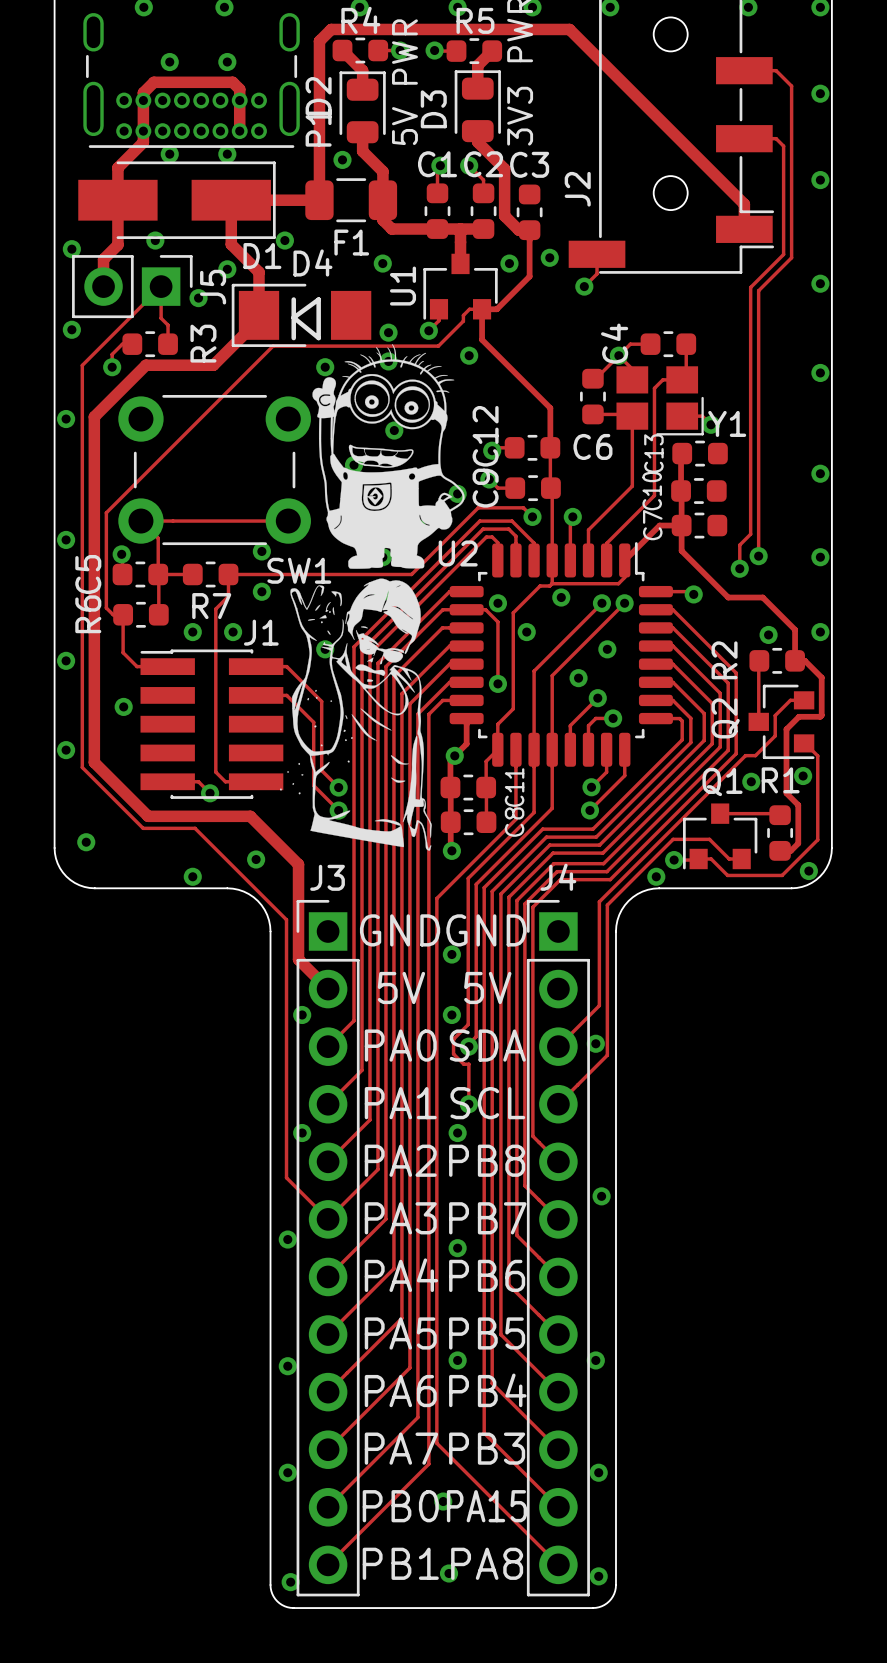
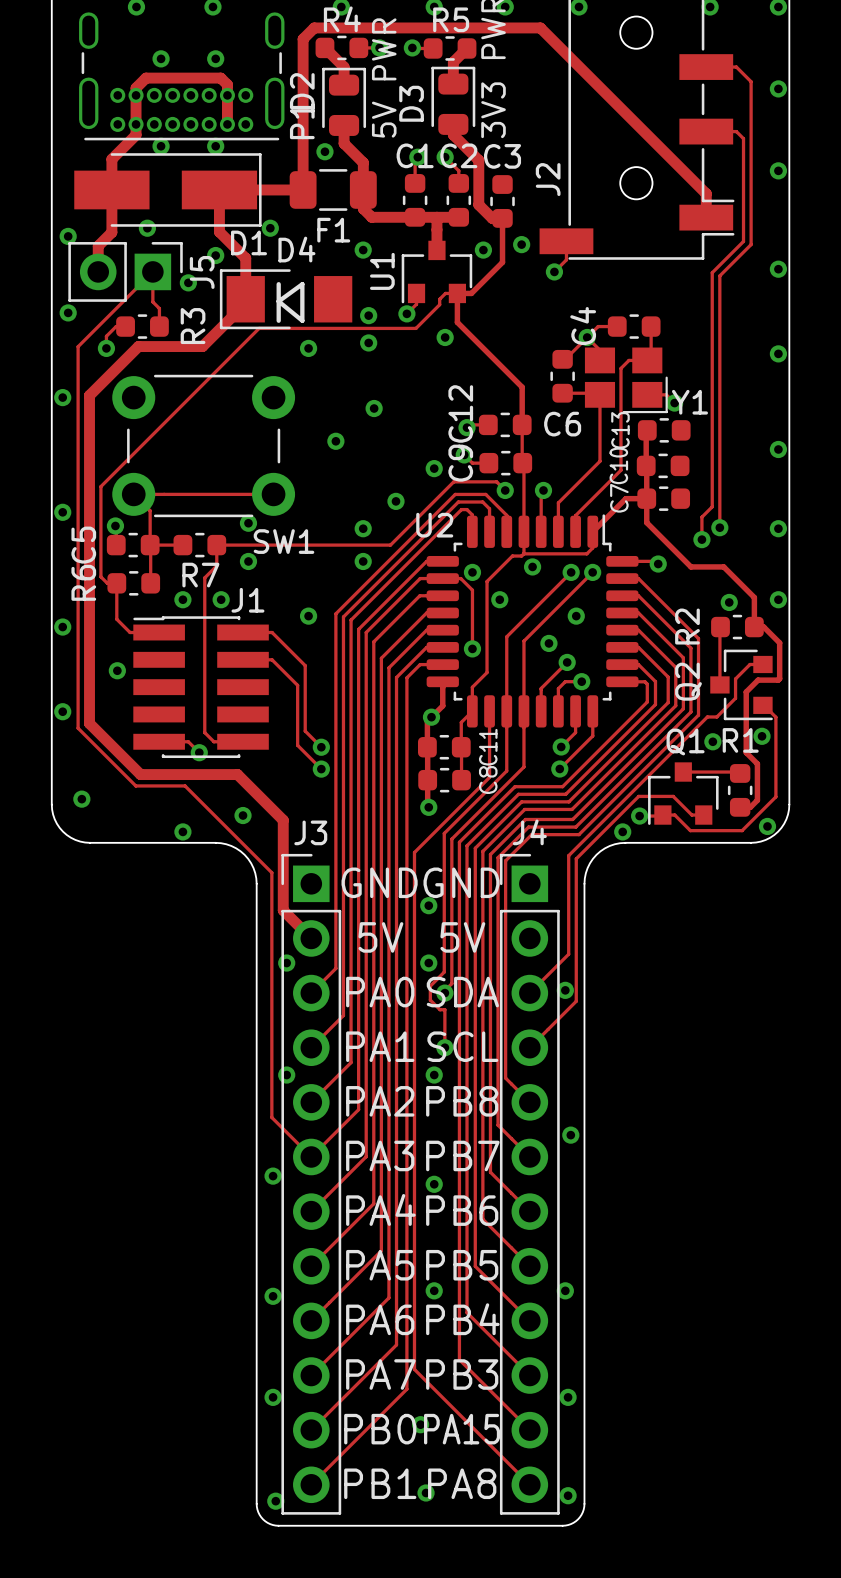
drawing: [279, 344, 465, 851] -> none

